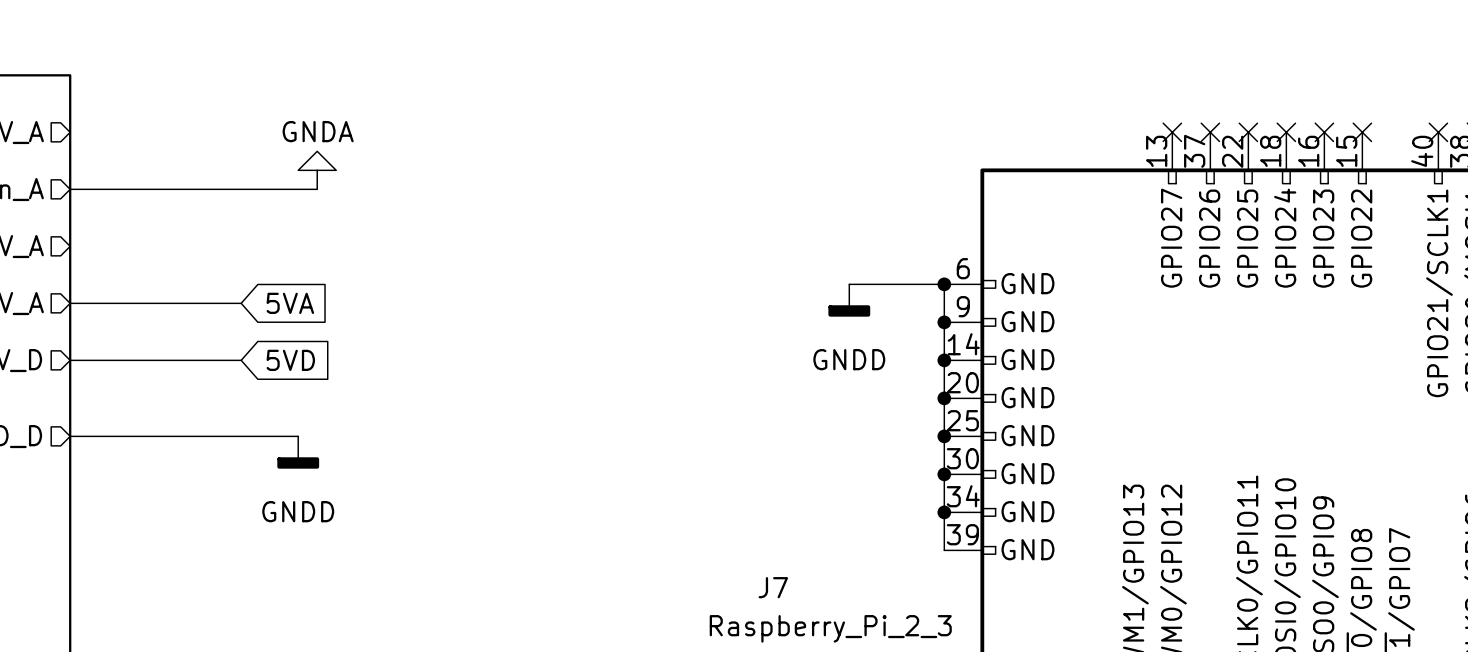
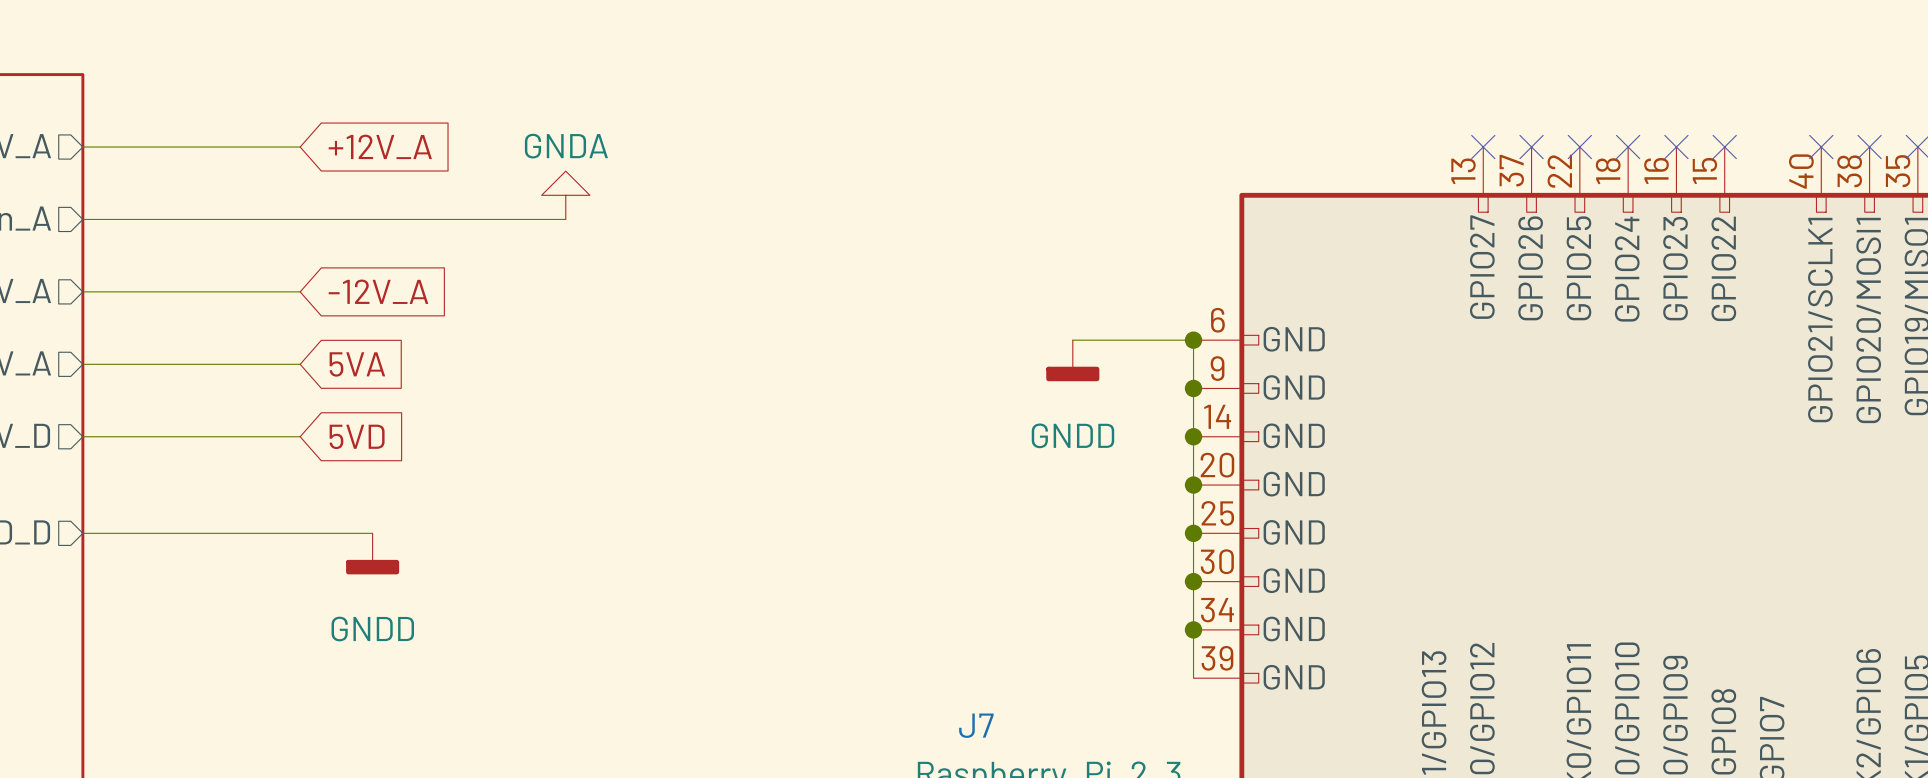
wire: none -> (82, 147) (300, 147)
global label: none -> +12V_A (380, 146)
power symbol position: GNDA (317, 170) -> GNDA (565, 195)
wire: none -> (396, 219) (565, 219)
wire: none -> (82, 291) (300, 291)
global label: none -> -12V_A (378, 291)

